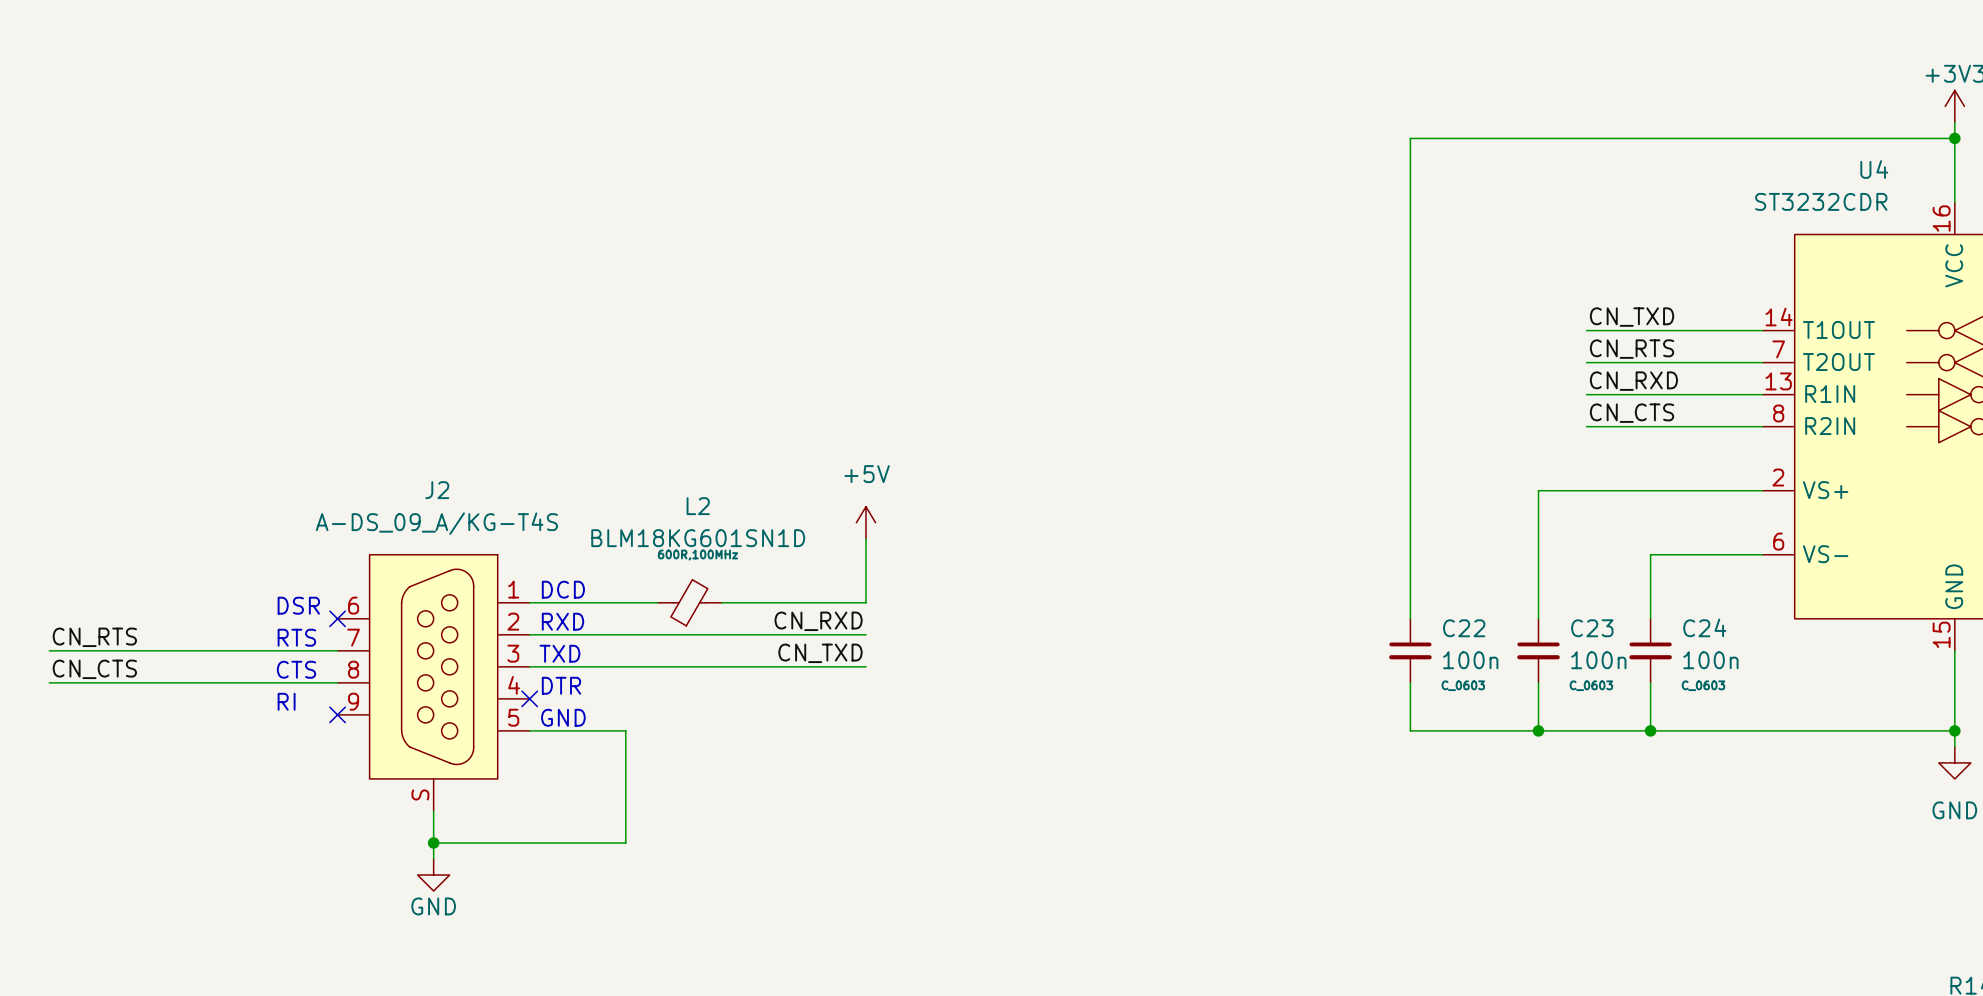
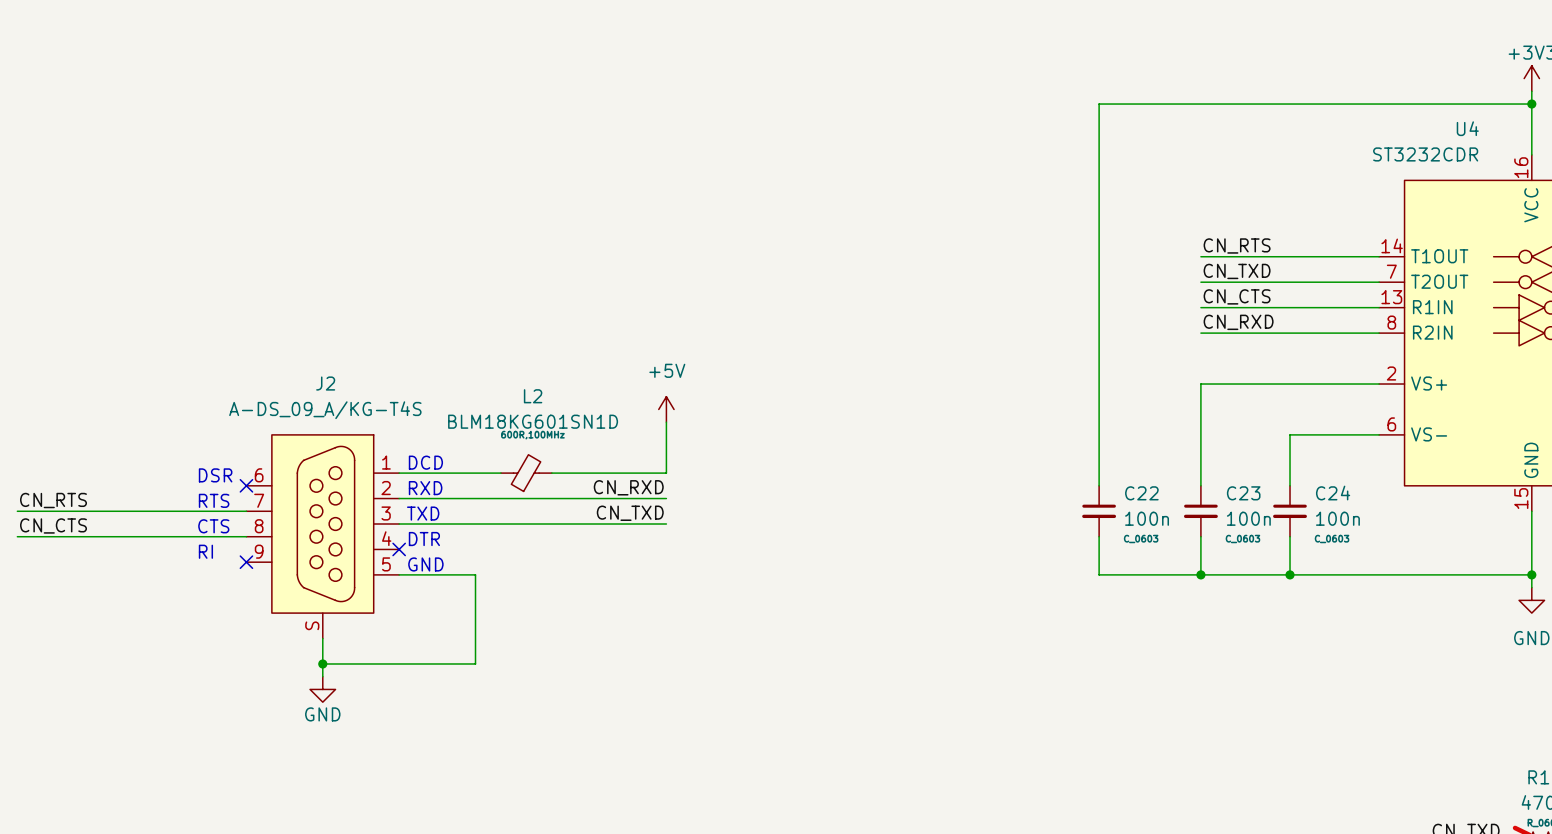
label position: CN_TXD (1632, 317) -> CN_TXD (1237, 271)
wire: none -> (1200, 256) (1239, 256)
label position: CN_RTS (1632, 349) -> CN_RTS (1237, 245)
wire: none -> (1200, 282) (1239, 282)
label position: CN_RXD (1633, 381) -> CN_RXD (1238, 322)
wire: none -> (1200, 307) (1239, 307)
label position: CN_CTS (1632, 413) -> CN_CTS (1237, 296)
wire: none -> (1200, 333) (1239, 333)

